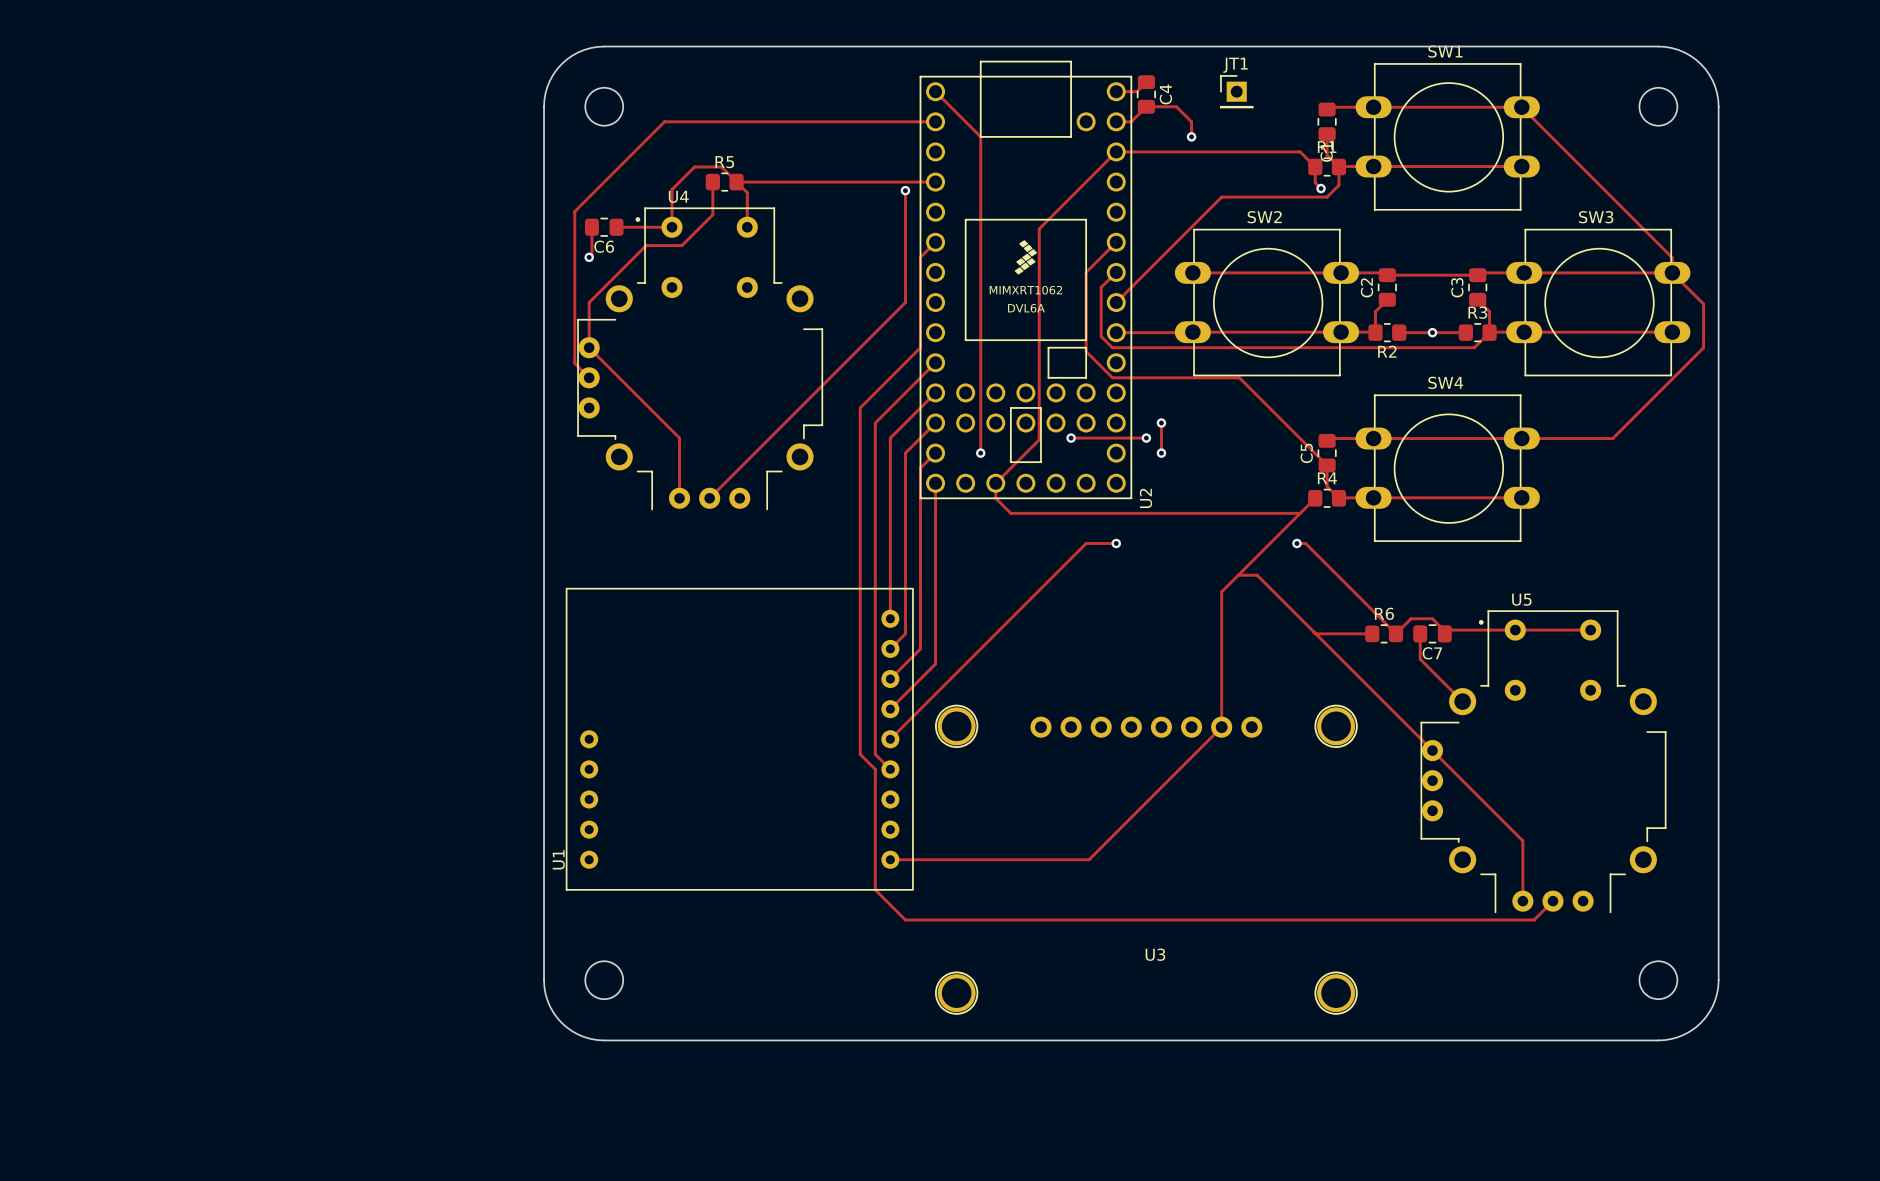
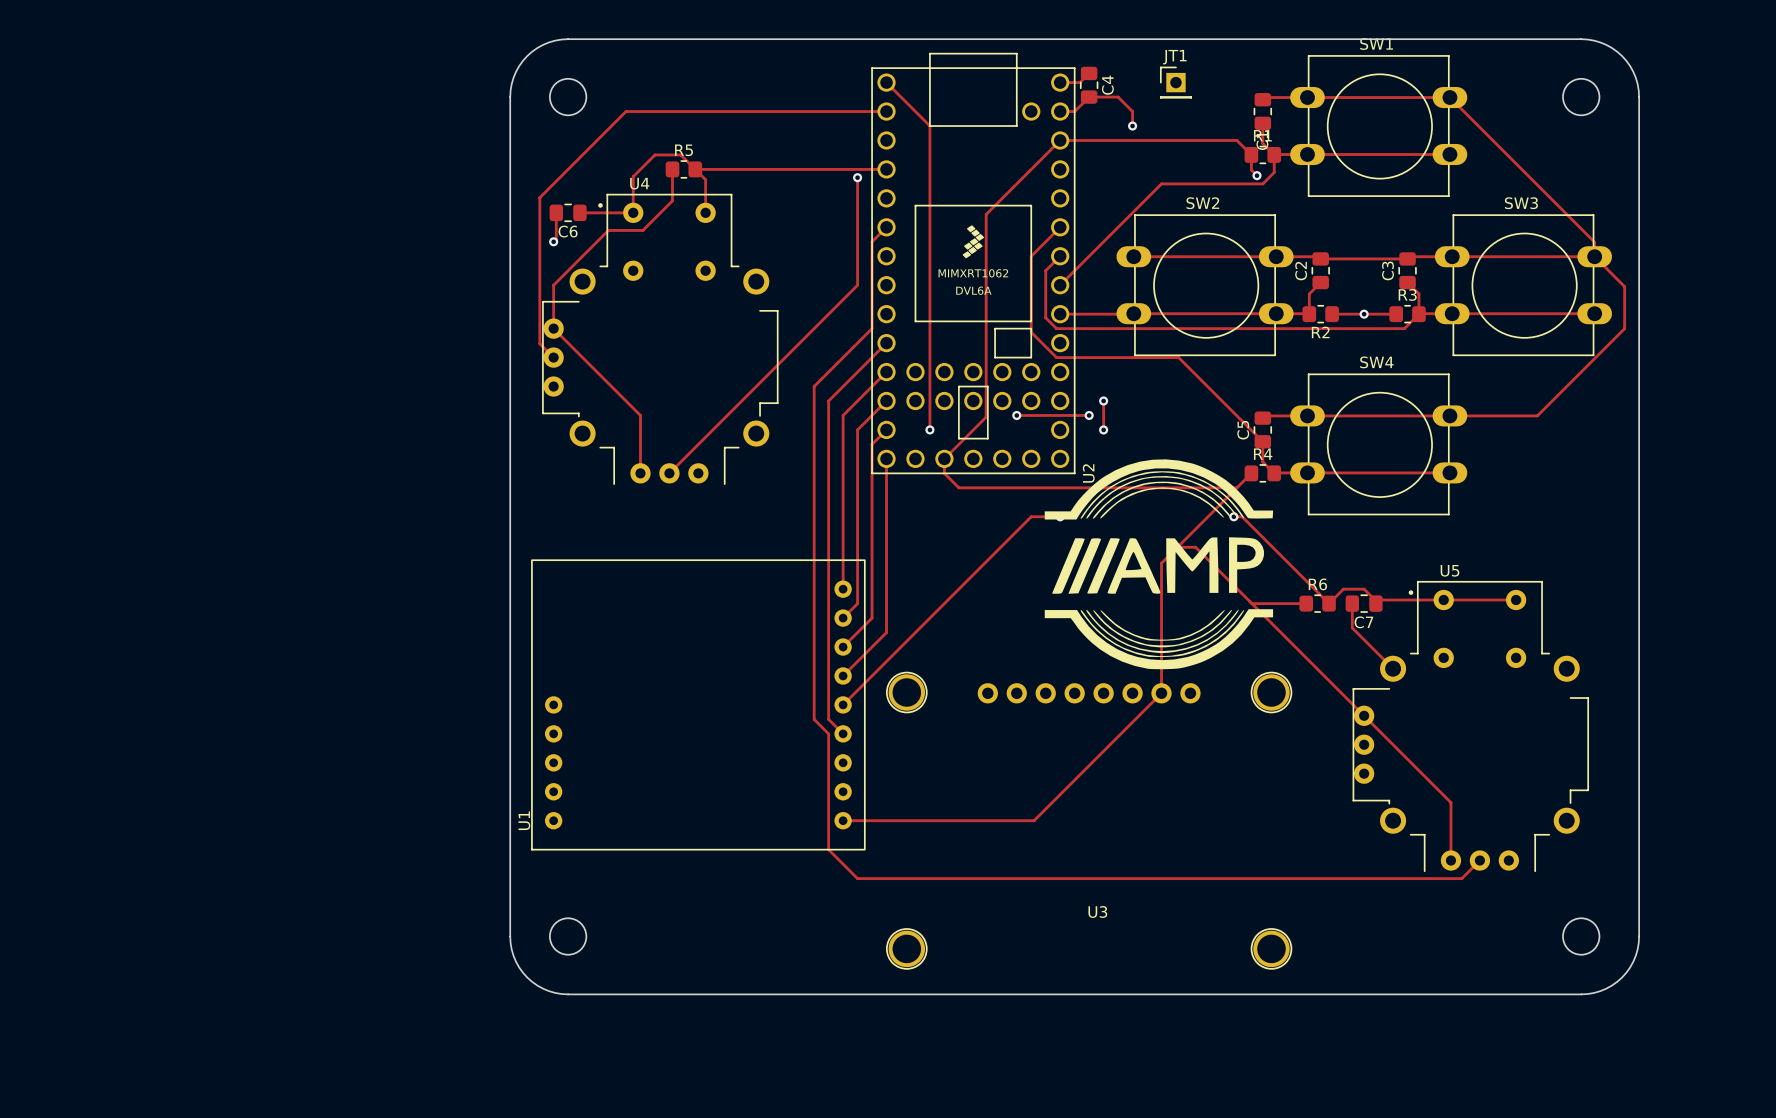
drawing: none -> [1044, 459, 1274, 670]

